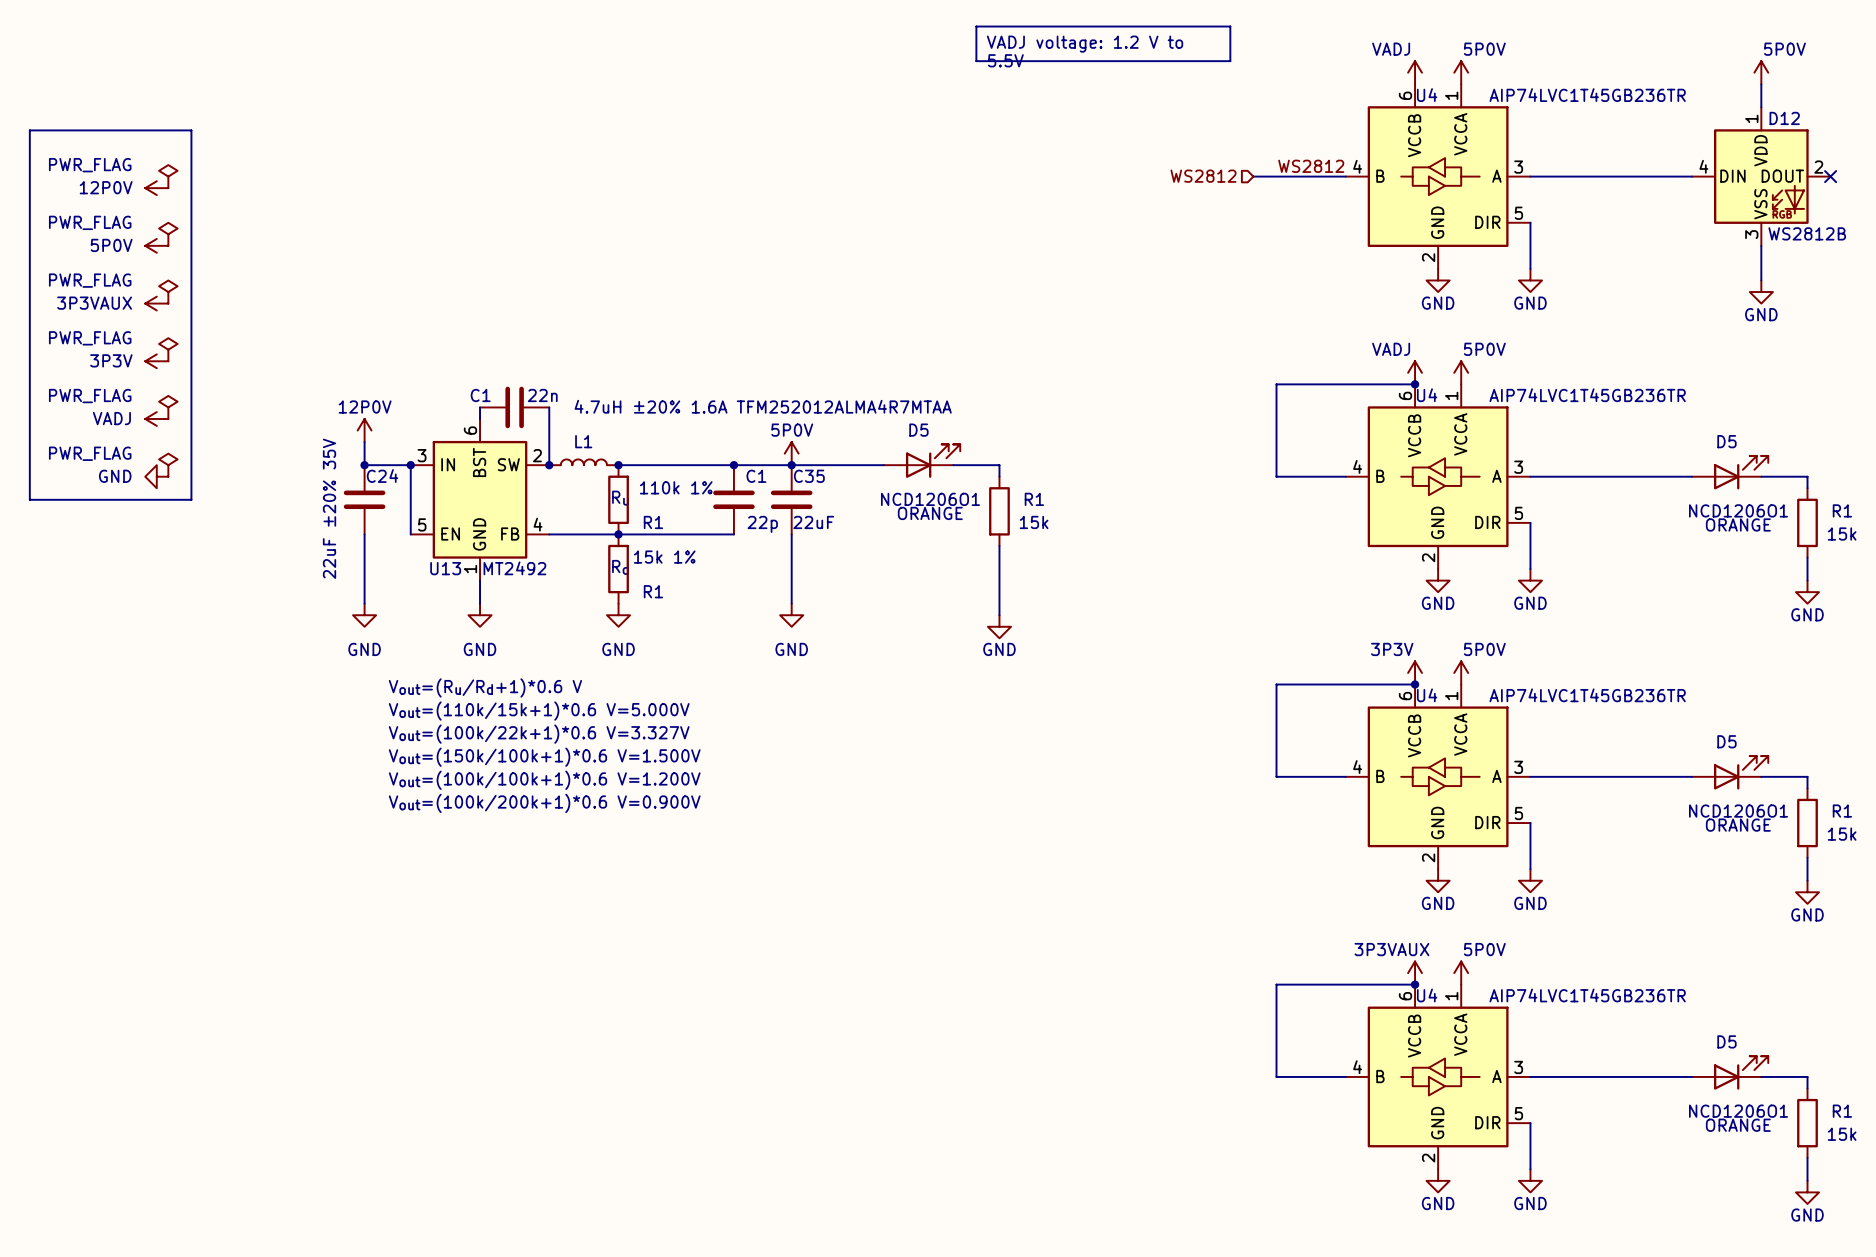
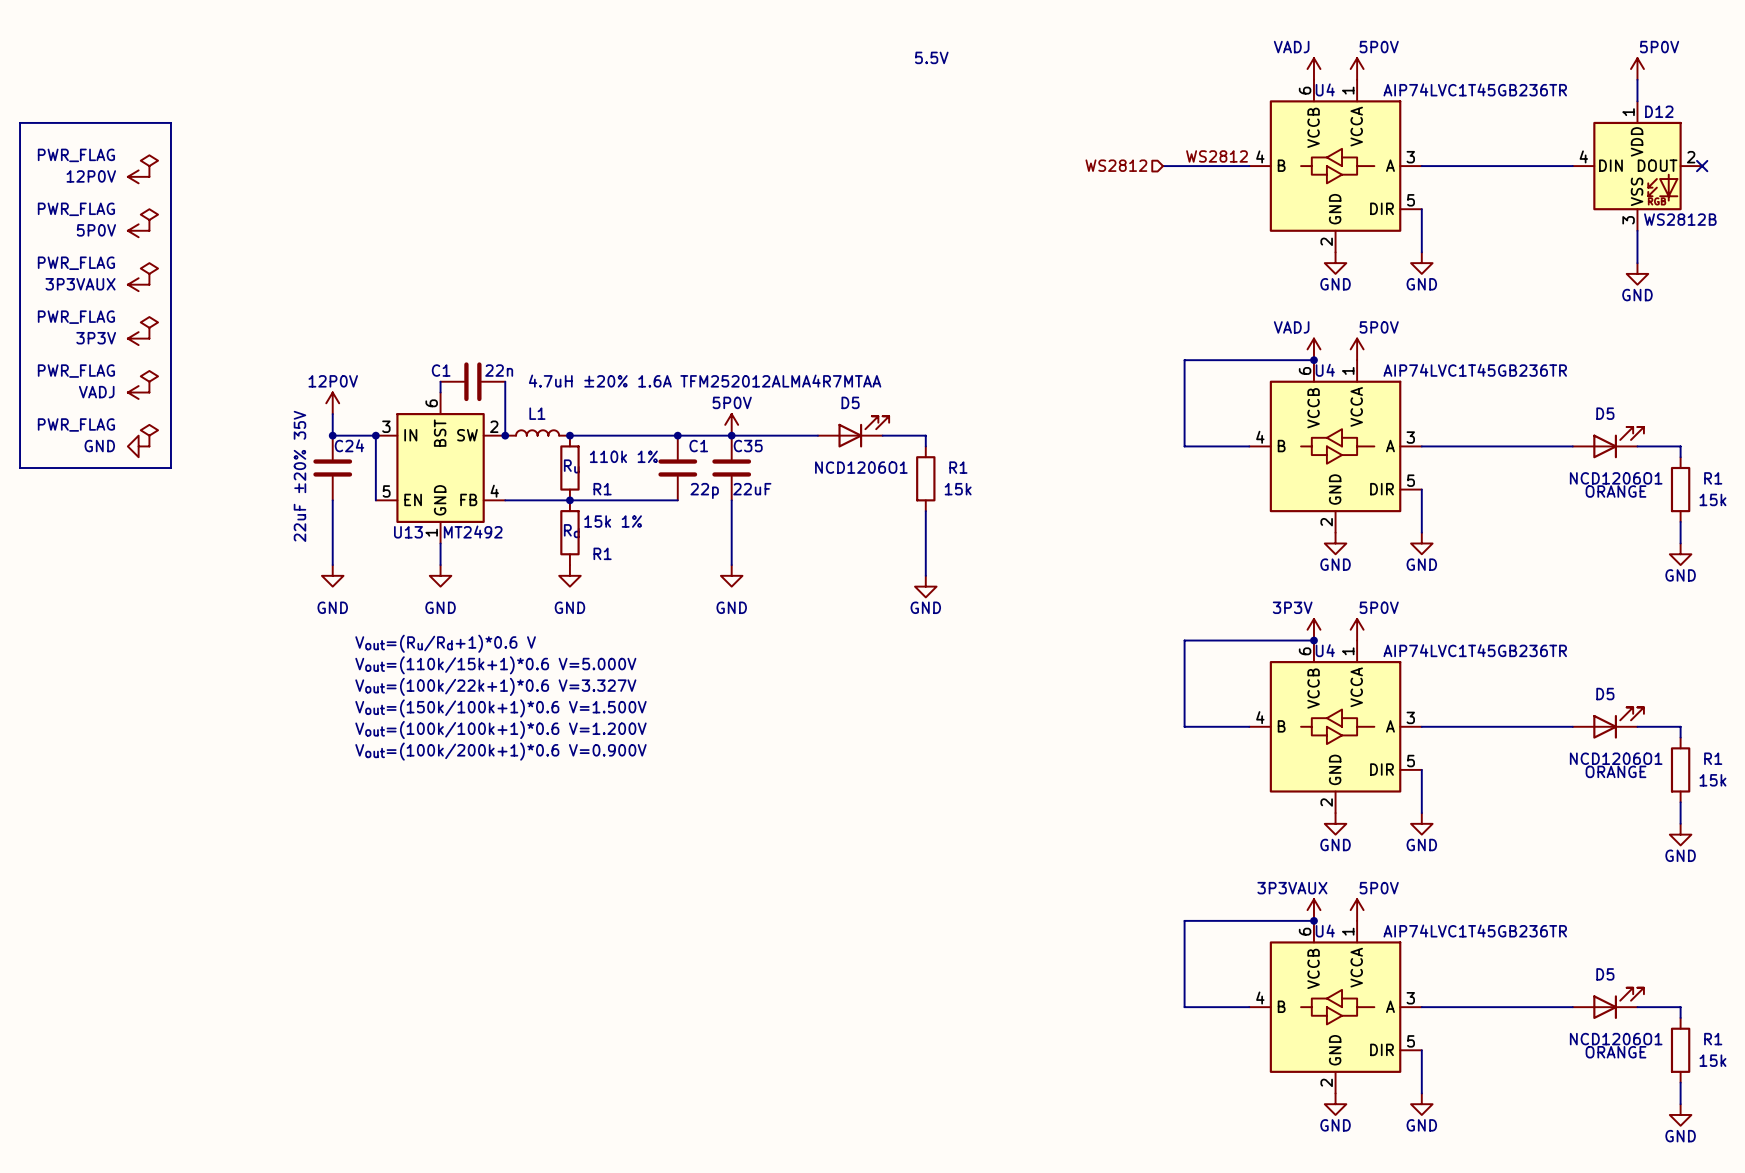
line: (976, 26) (1230, 26) (1230, 61) (976, 61) (976, 26) -> none
text: VADJ voltage: 1.2 V to (1085, 44) -> none
text: ORANGE (930, 513) -> none

